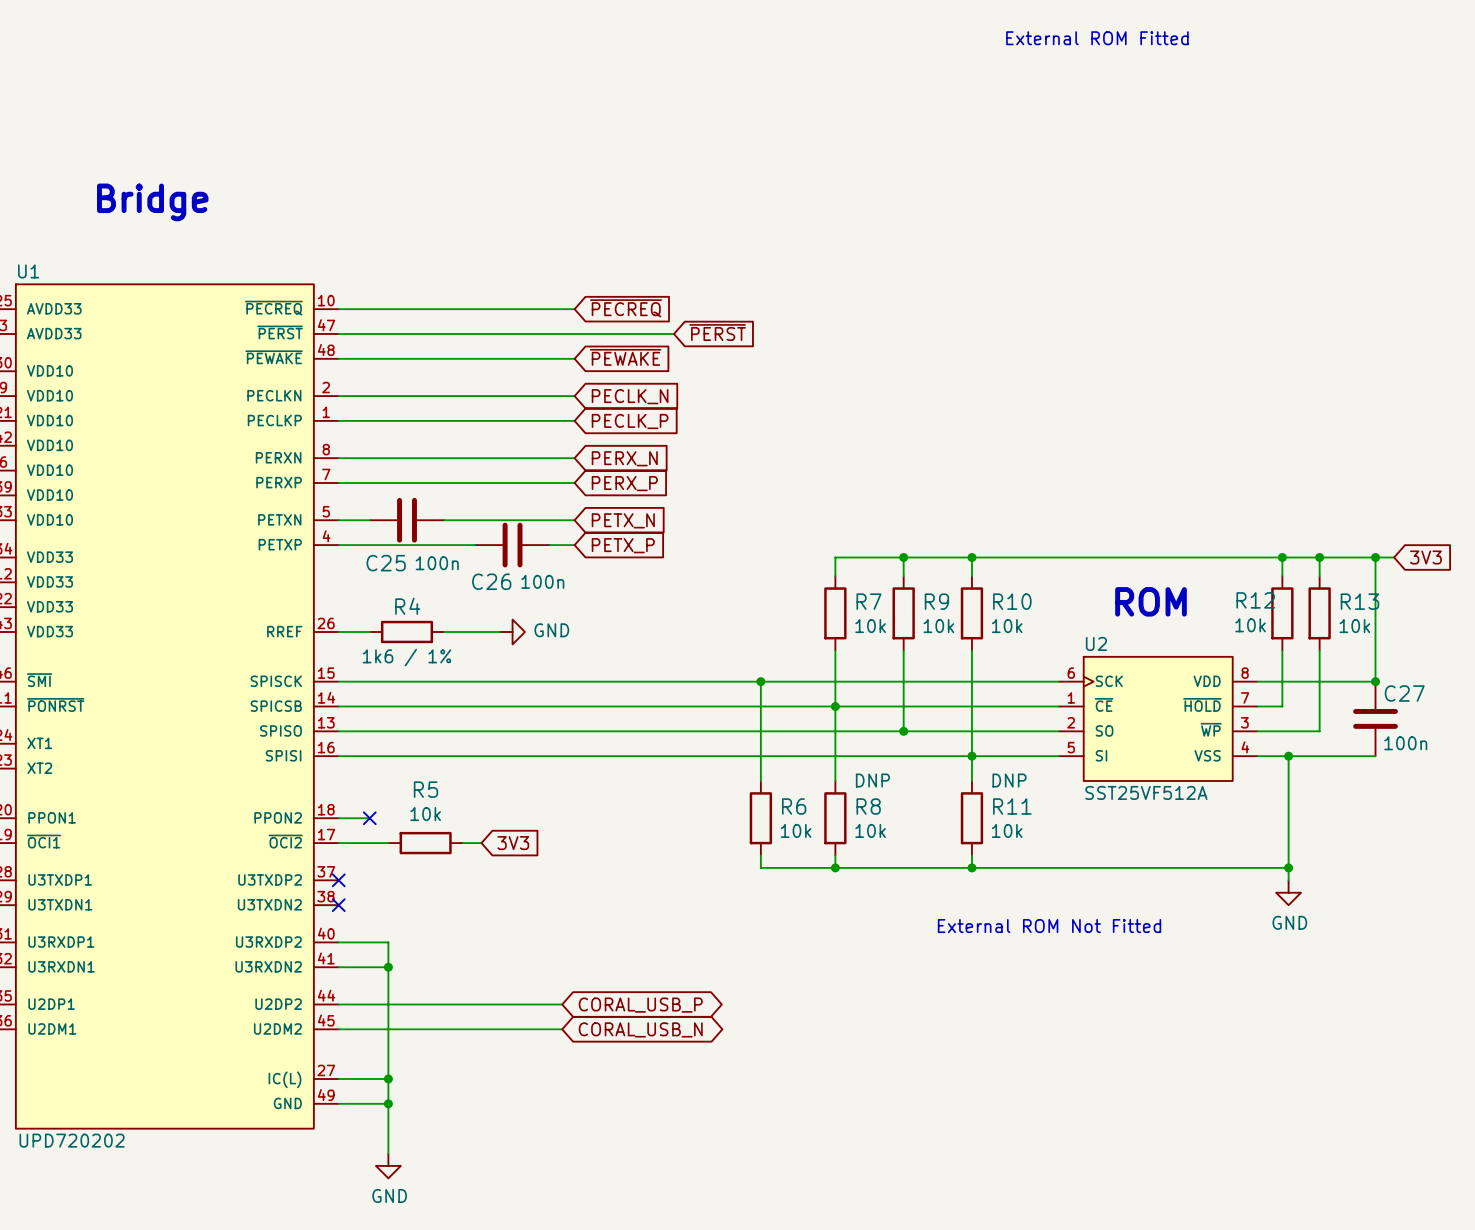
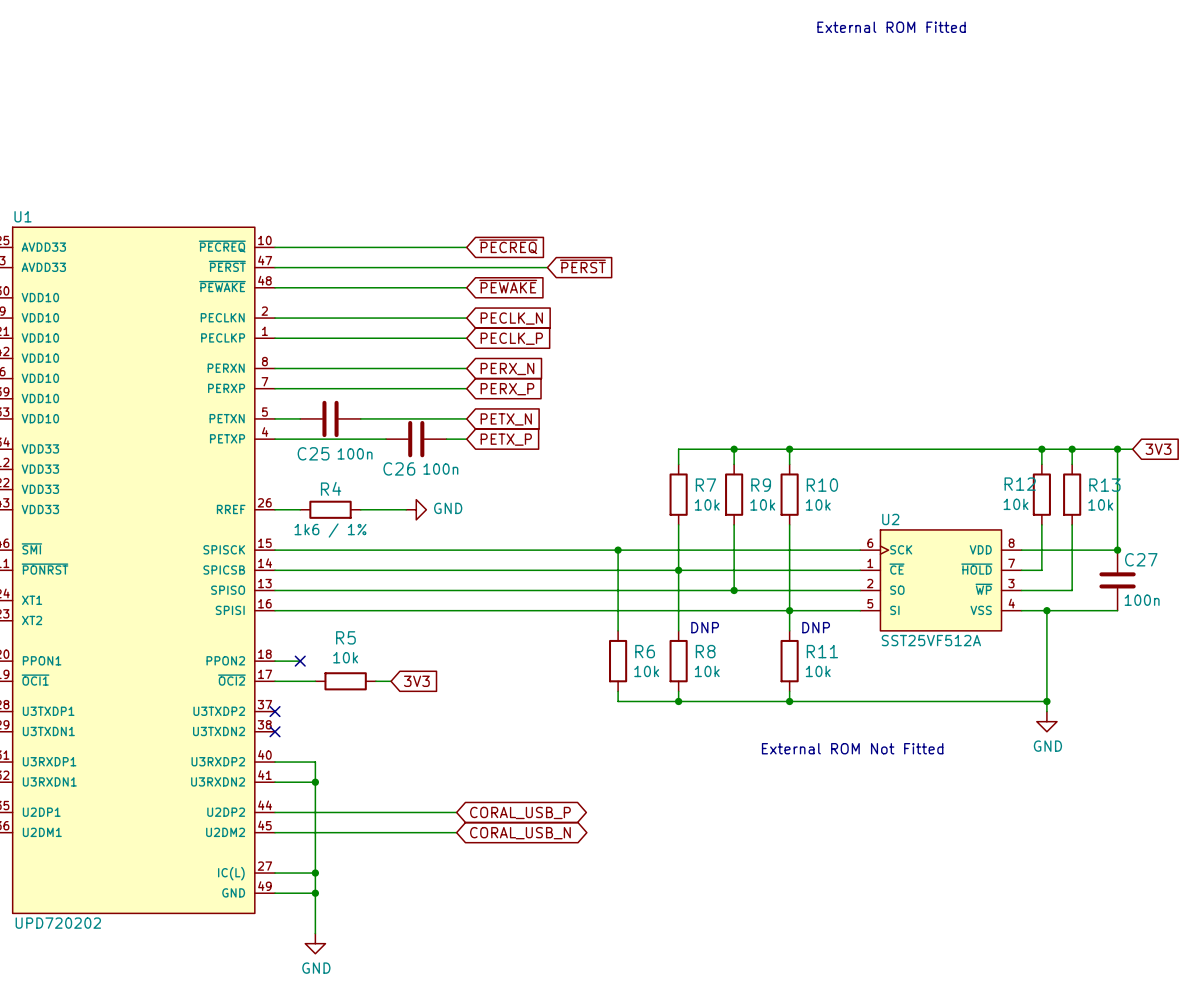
text: Bridge (152, 202) -> none
text: ROM (1151, 601) -> none
text: none -> DNP (705, 627)
text: none -> DNP (816, 627)
R8 text: DNP (872, 780) -> none
R11 text: DNP (1009, 780) -> none

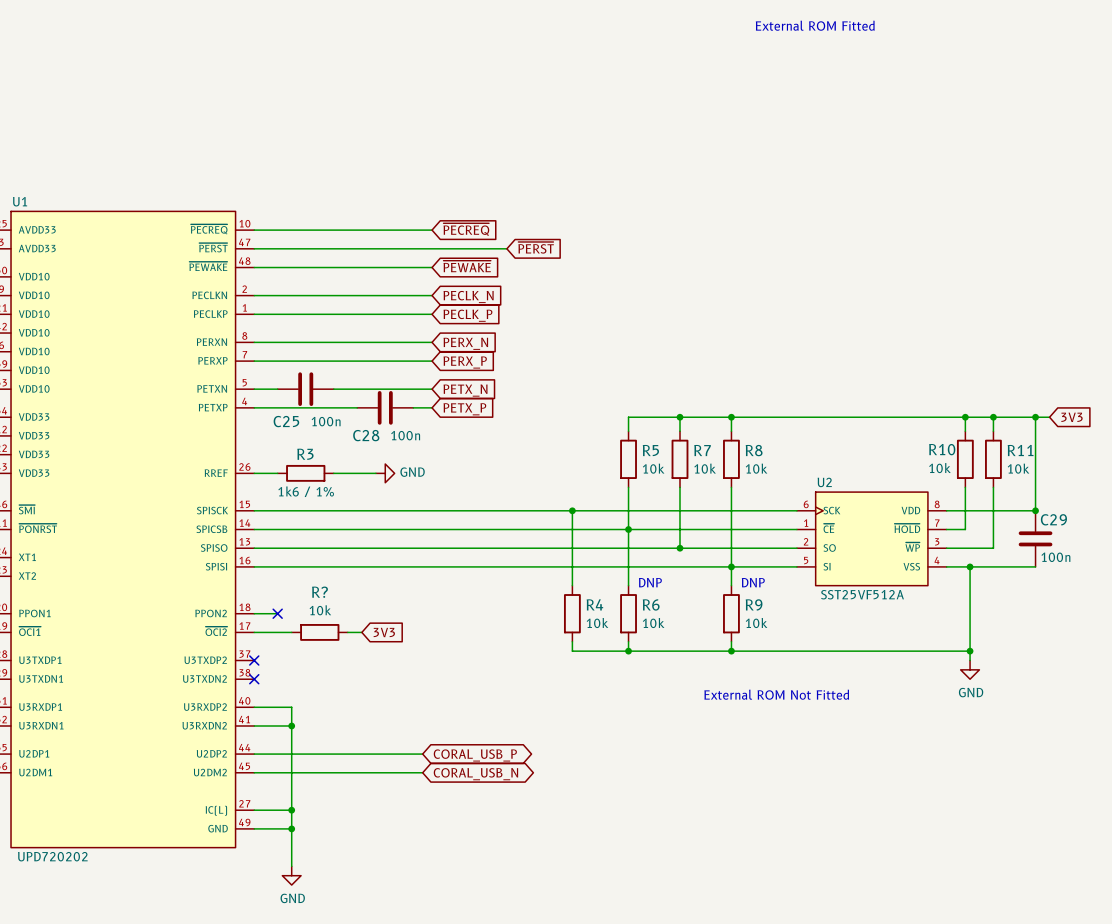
C26 name: C26 (399, 468) -> C28 (366, 435)
R12 name: R12 (1020, 484) -> R10 (942, 449)
R7 name: R7 (705, 485) -> R5 (650, 450)
R9 name: R9 (761, 485) -> R7 (702, 450)
R10 name: R10 (822, 485) -> R8 (754, 450)
R13 name: R13 (1104, 485) -> R11 (1020, 450)
R4 name: R4 (331, 488) -> R3 (305, 454)
C27 name: C27 (1141, 559) -> C29 (1053, 519)
R5 name: R5 (345, 637) -> R? (319, 592)
R6 name: R6 (645, 651) -> R4 (594, 604)
R8 name: R8 (705, 651) -> R6 (651, 604)
R11 name: R11 (822, 651) -> R9 (754, 604)

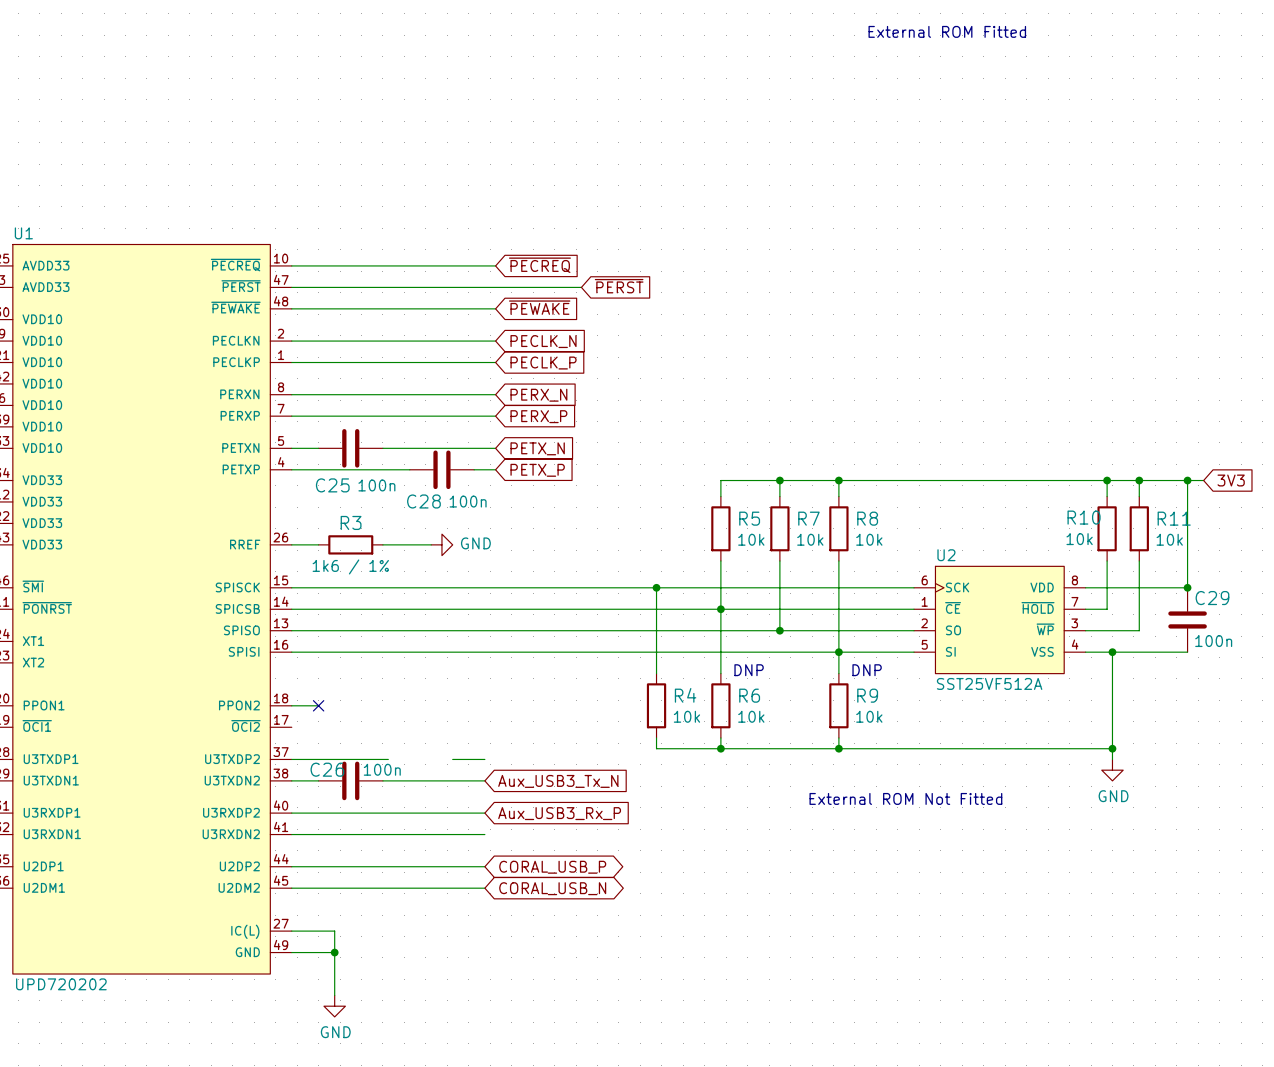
wire: (254, 632) (291, 632) -> none
R?: (319, 632) -> none
wire: (347, 632) (361, 632) -> none
global label: 3V3 (384, 632) -> none
wire: none -> (291, 759) (388, 759)
no-connect mark: (254, 660) -> none
wire: none -> (452, 759) (484, 759)
wire: none -> (291, 780) (318, 780)
no-connect mark: (254, 679) -> none
C26: none -> (350, 780)
wire: none -> (382, 780) (484, 780)
global label: none -> Aux_USB3_Tx_N (558, 781)
wire: (291, 707) (291, 810) -> (334, 813) (484, 813)
global label: none -> Aux_USB3_Rx_P (559, 813)
wire: none -> (334, 834) (484, 834)
junction: (291, 725) -> none
junction: (291, 810) -> none

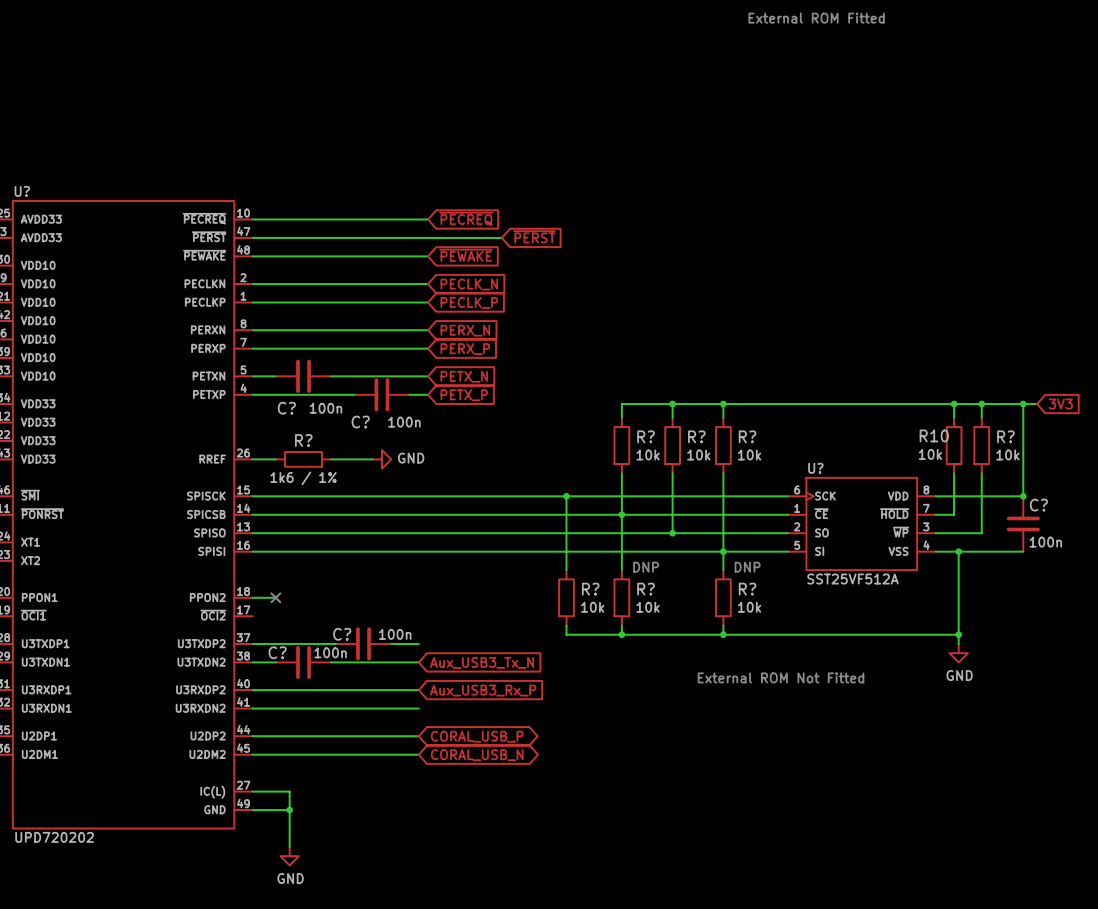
U1 name: U1 (23, 233) -> U? (22, 191)
C25 name: C25 (332, 485) -> C? (286, 408)
C28 name: C28 (423, 501) -> C? (360, 422)
R5 name: R5 (749, 518) -> R? (646, 436)
R7 name: R7 (808, 518) -> R? (696, 436)
R8 name: R8 (867, 518) -> R? (747, 436)
R11 name: R11 (1174, 518) -> R? (1005, 436)
R3 name: R3 (351, 522) -> R? (303, 440)
U2 name: U2 (946, 555) -> U? (815, 468)
C29 name: C29 (1212, 598) -> C? (1038, 505)
R4 name: R4 (685, 695) -> R? (590, 589)
R6 name: R6 (749, 695) -> R? (646, 589)
R9 name: R9 (867, 695) -> R? (747, 589)
C?: none -> (363, 643)
C26 name: C26 (327, 769) -> C? (277, 652)

